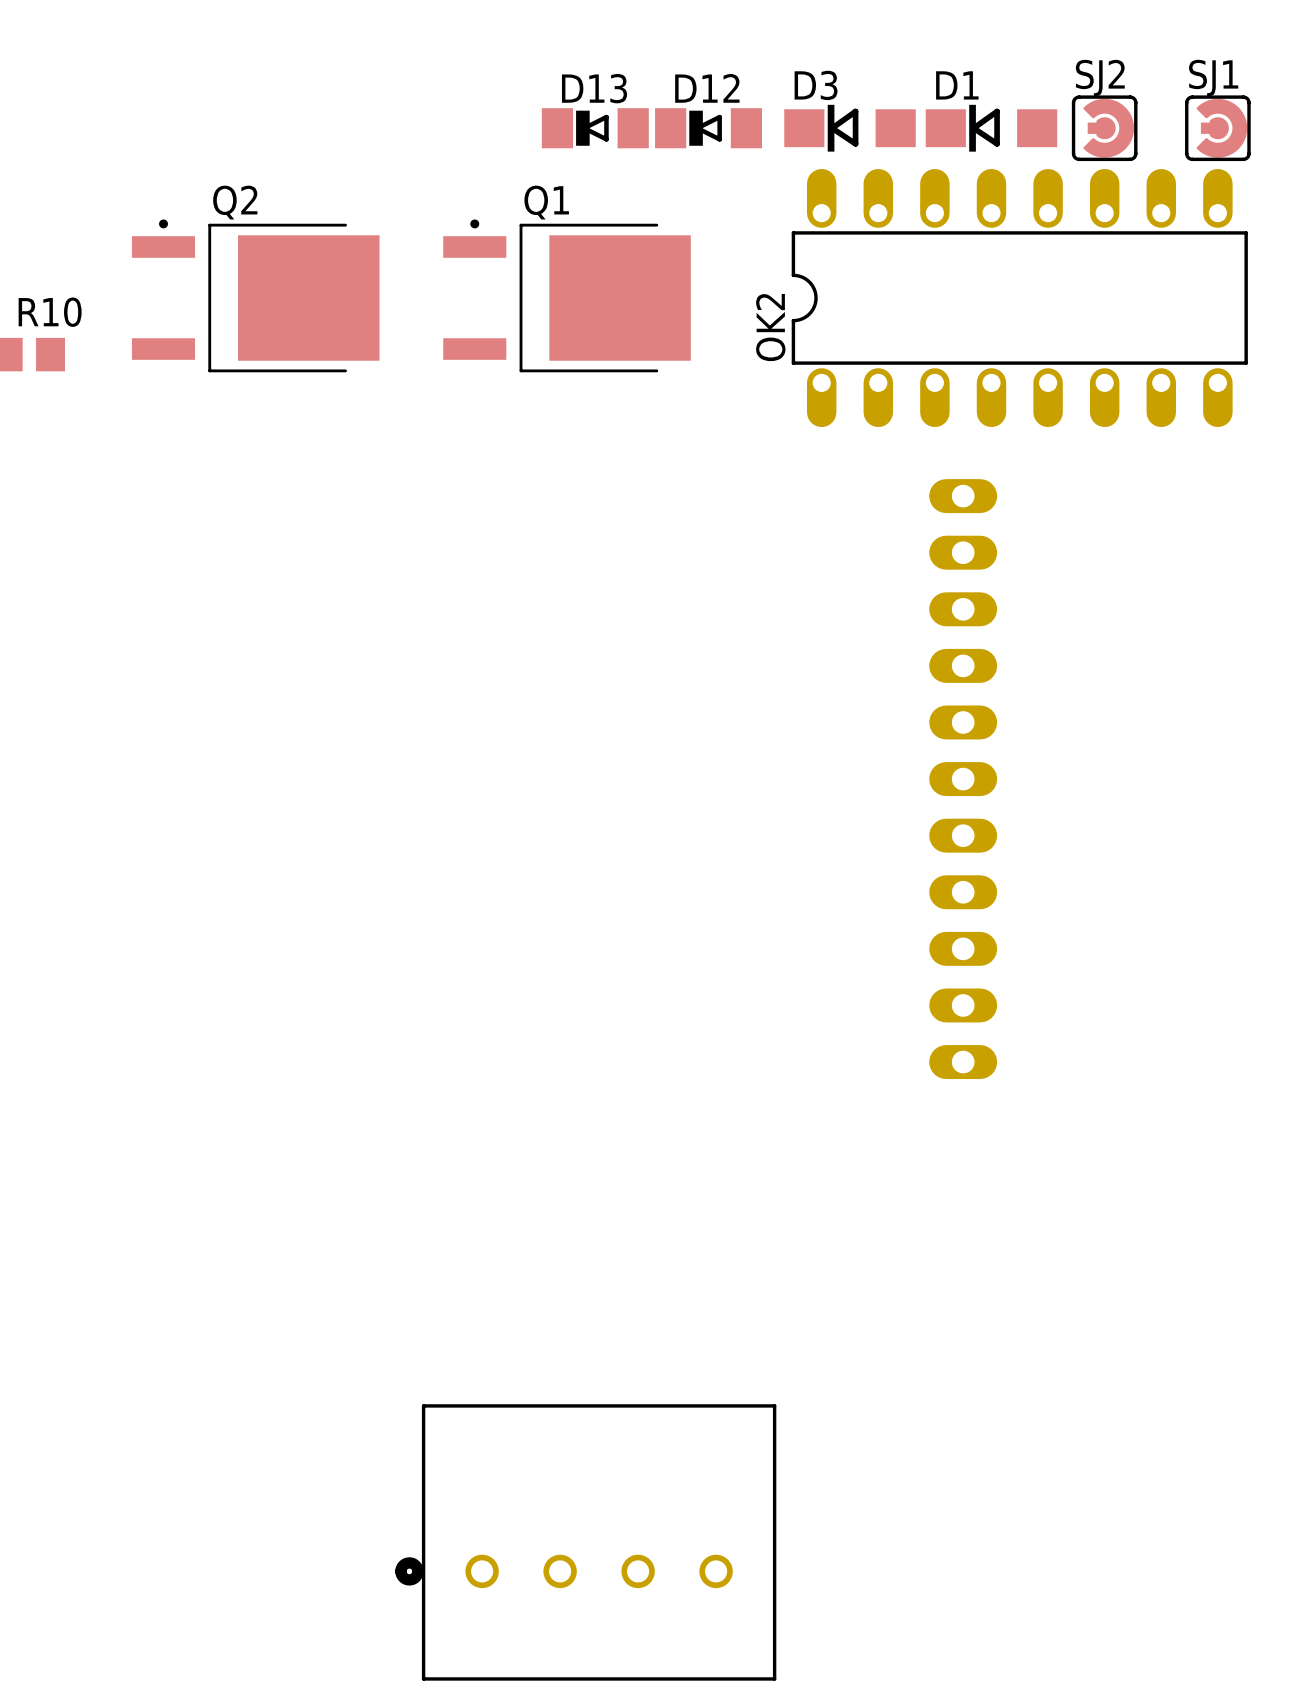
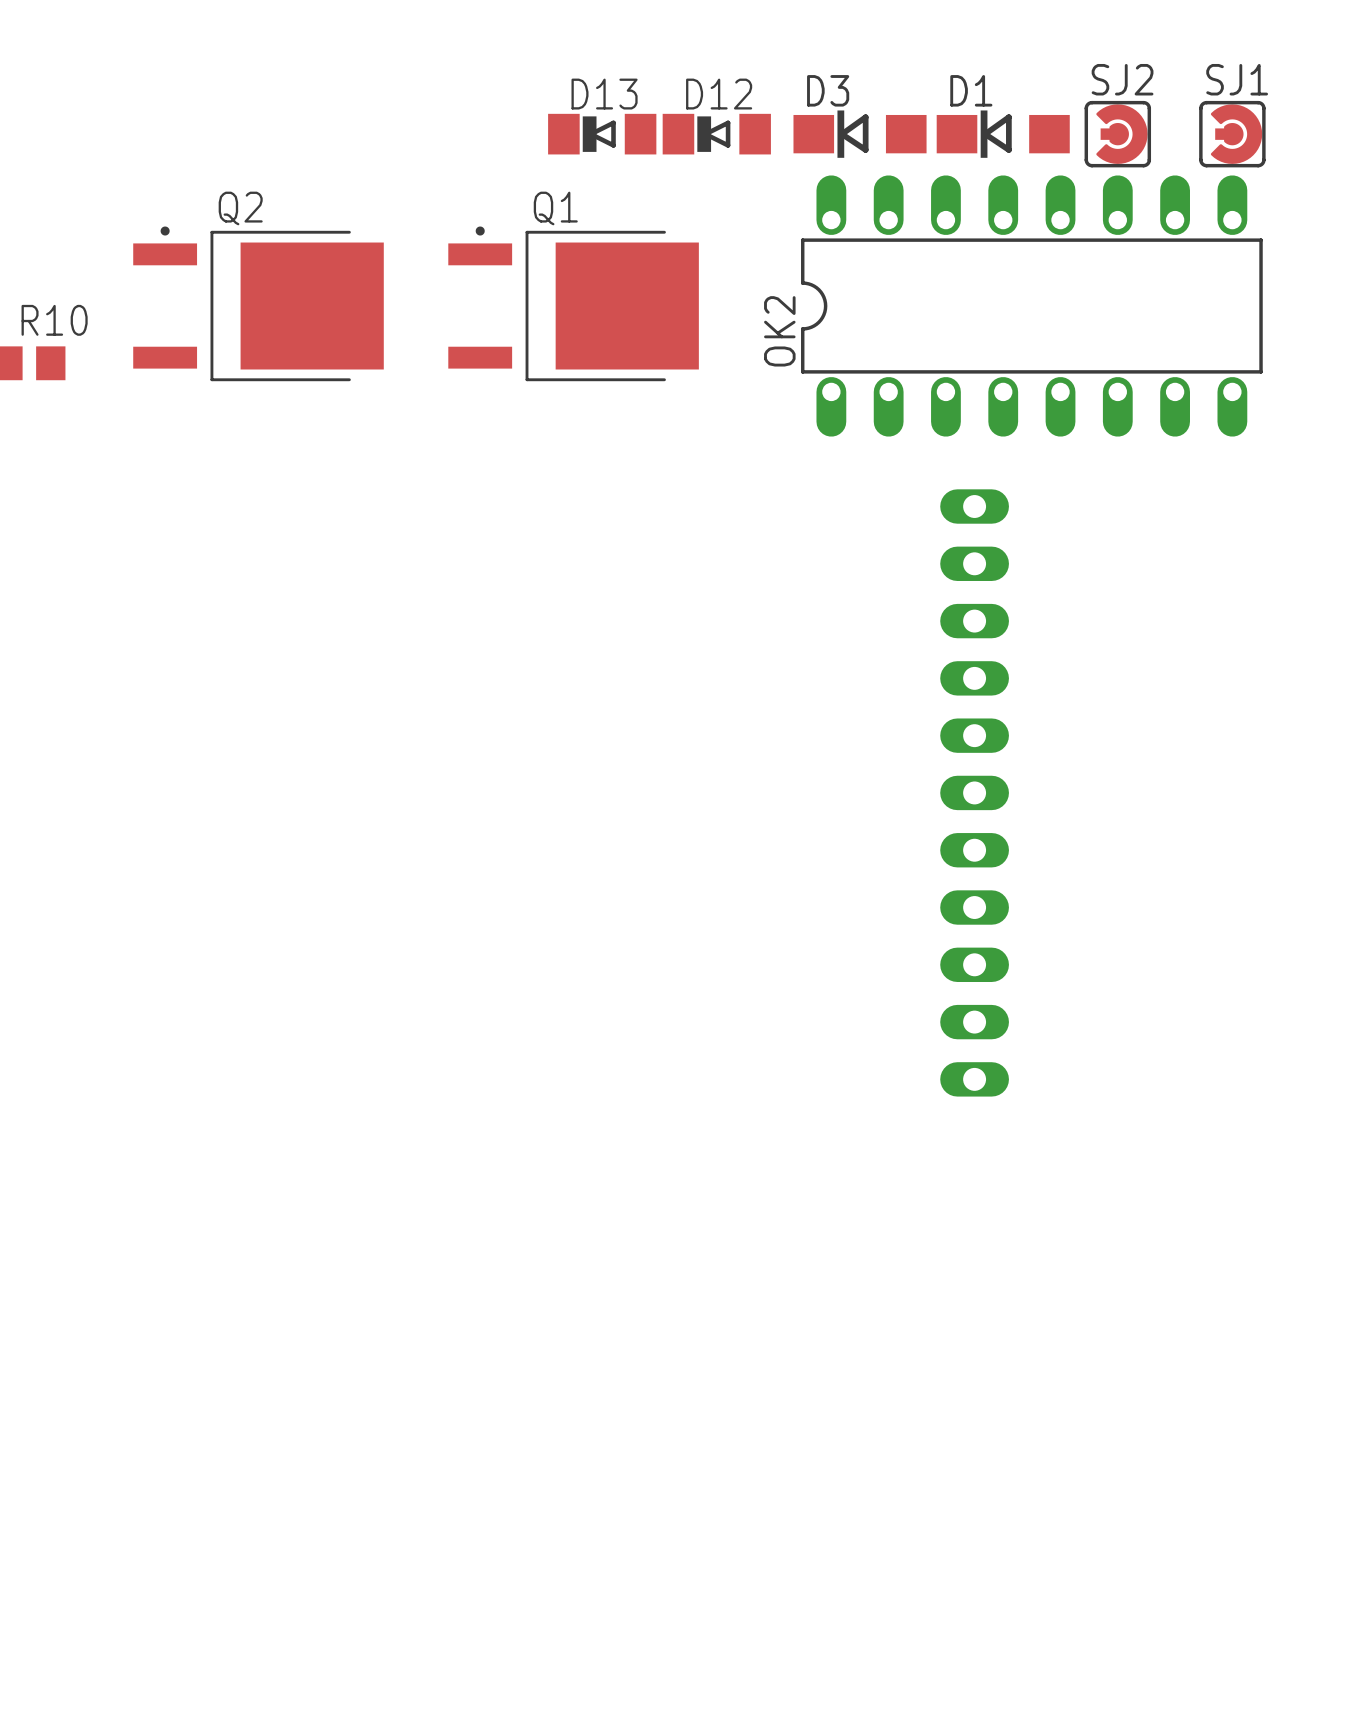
part: (585, 1542) -> none

